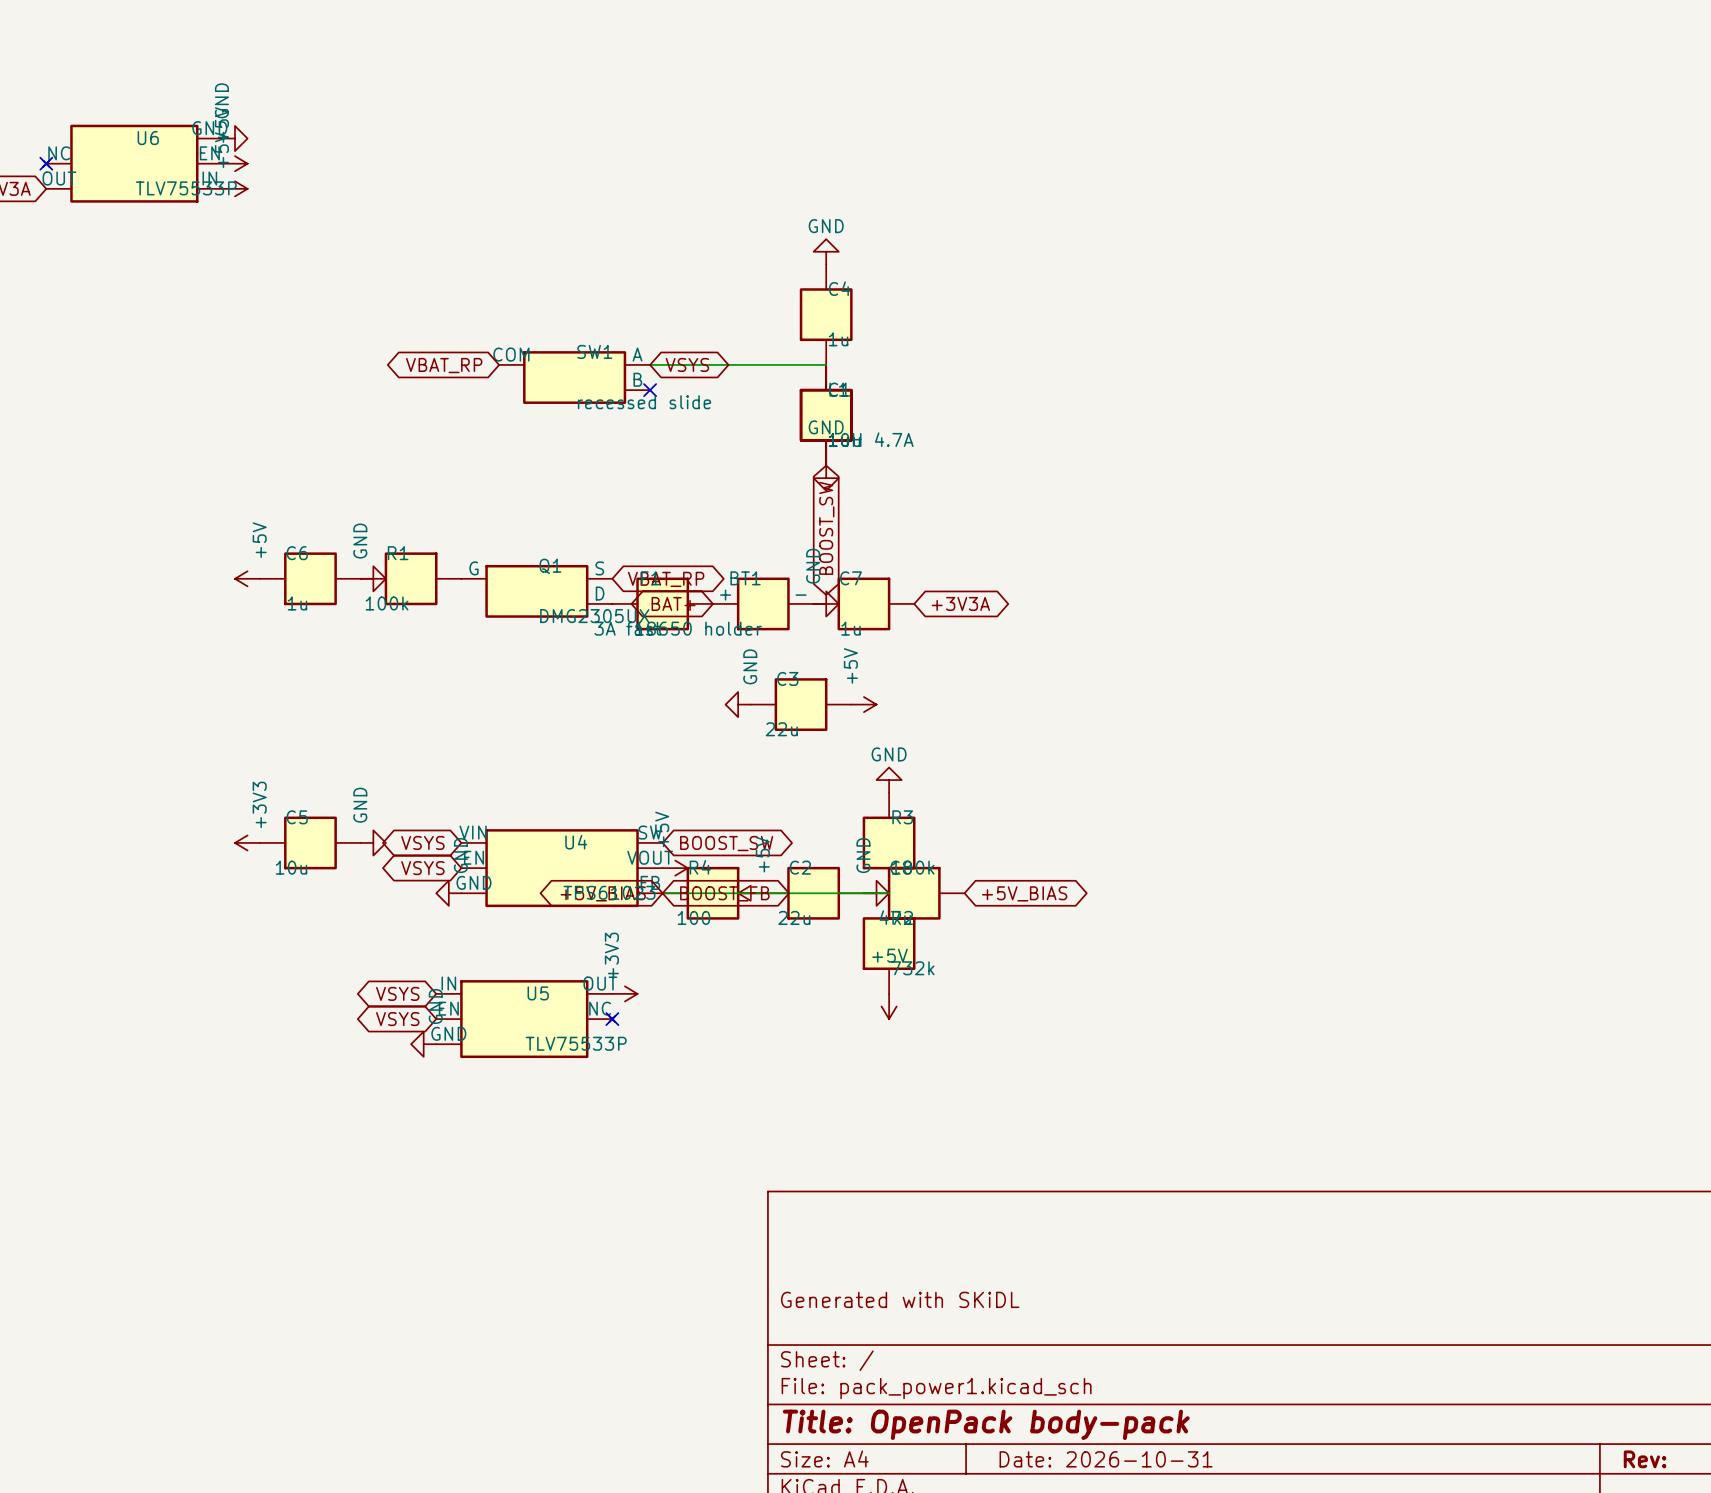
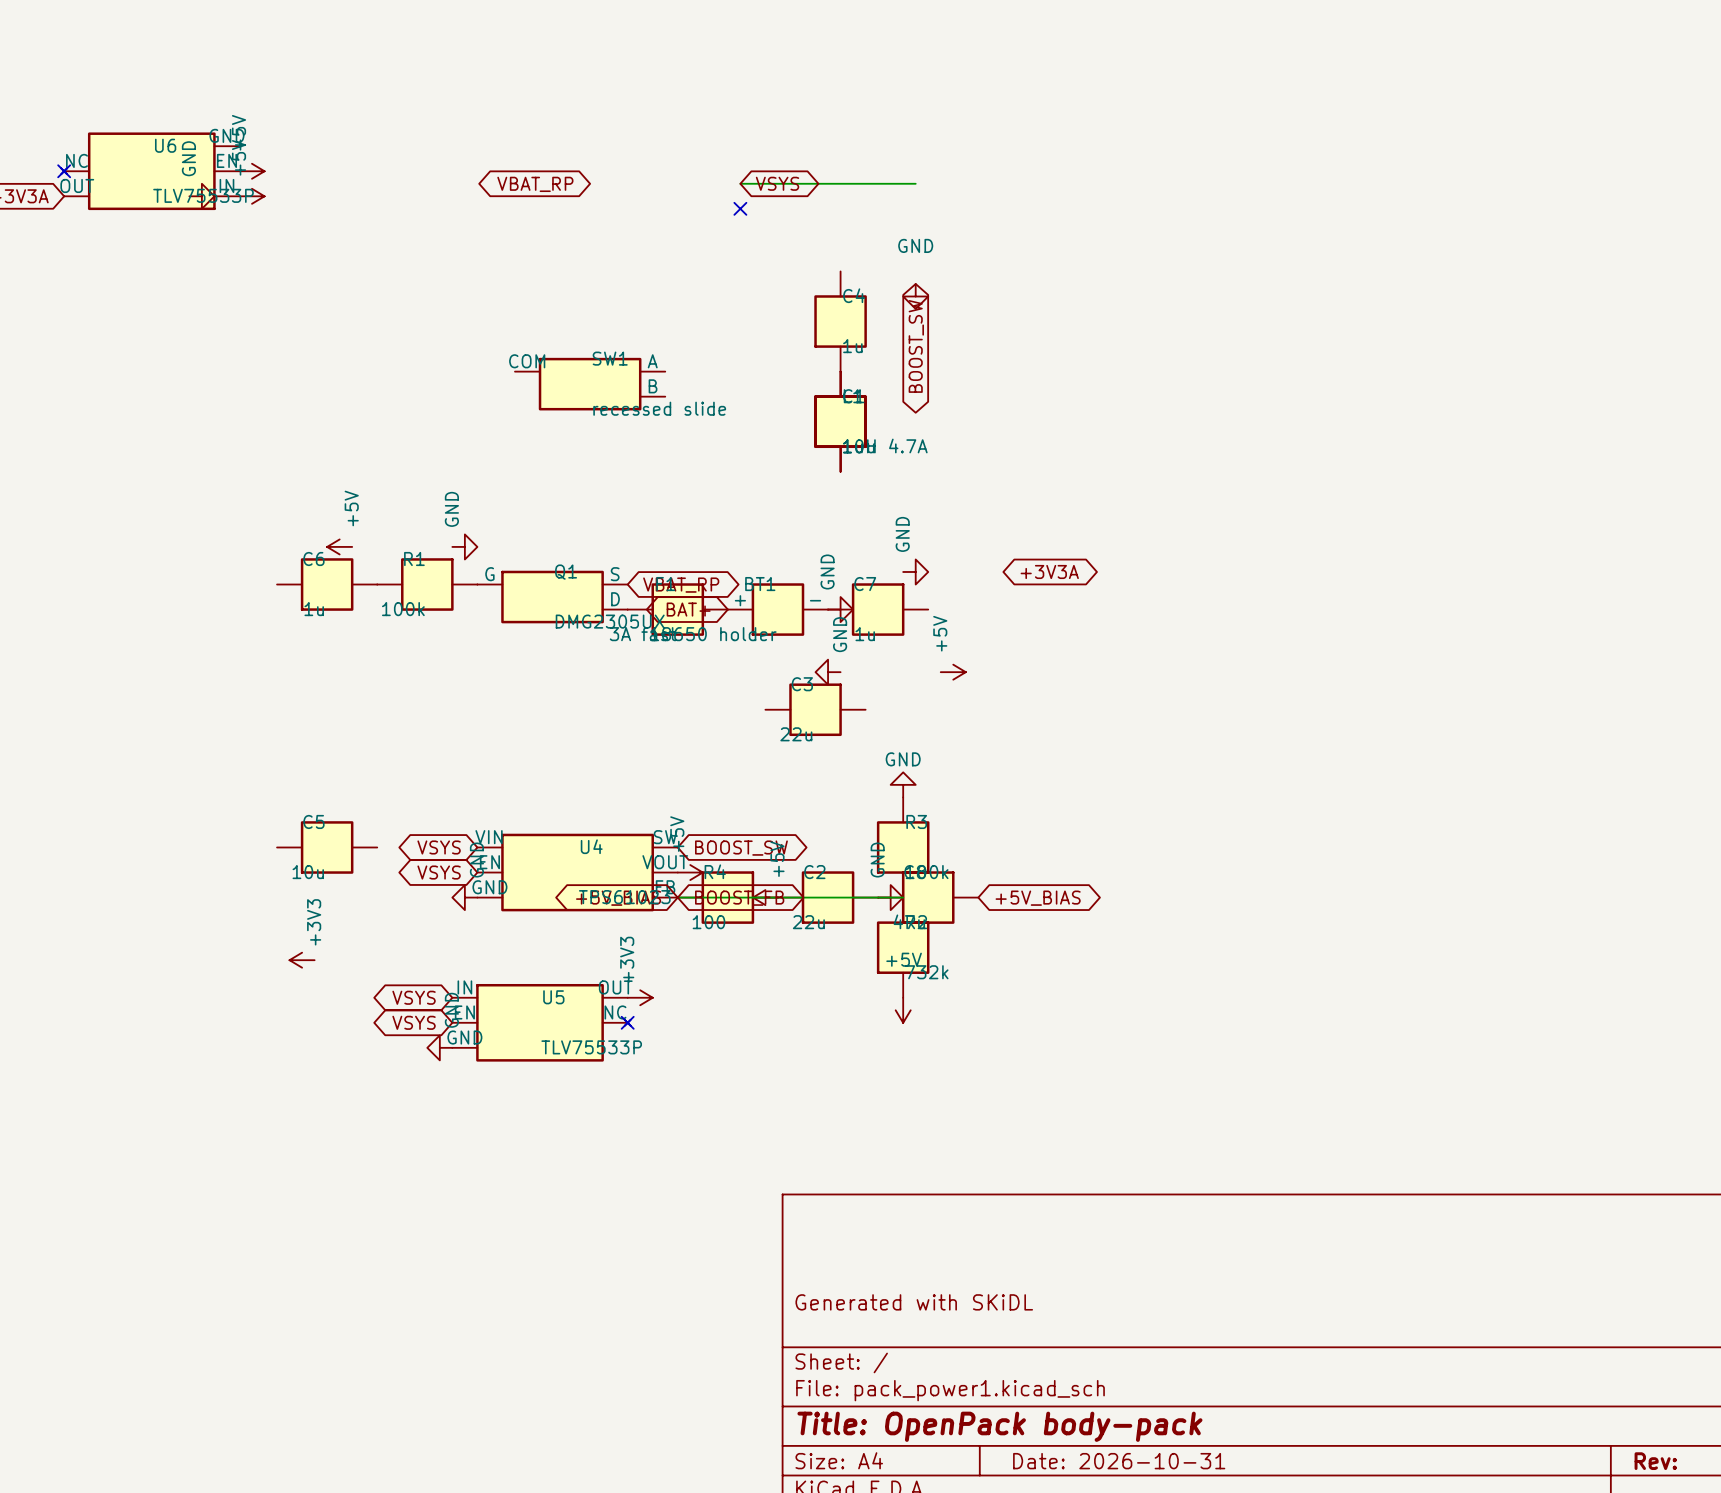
power symbol position: GND (234, 138) -> GND (201, 196)
no-connect mark: none -> (740, 208)
power symbol text position: GND (826, 226) -> GND (915, 245)
power symbol rotation: 0° (826, 251) -> 180° (915, 296)
power symbol position: GND (826, 251) -> GND (915, 296)
wire: (650, 364) (826, 364) -> (740, 183) (915, 183)
global label position: VSYS (687, 364) -> VSYS (777, 183)
global label position: VBAT_RP (444, 365) -> VBAT_RP (535, 184)
no-connect mark: (650, 390) -> none
power symbol: GND (826, 478) -> none
global label position: BOOST_SW (826, 528) -> BOOST_SW (916, 346)
power symbol: none -> GND (915, 571)
power symbol position: +5V (247, 578) -> +5V (339, 546)
power symbol position: GND (373, 578) -> GND (464, 546)
global label position: +3V3A (960, 603) -> +3V3A (1049, 571)
power symbol position: GND (738, 704) -> GND (828, 672)
power symbol position: +5V (863, 704) -> +5V (953, 672)
power symbol position: +3V3 (247, 842) -> +3V3 (302, 960)
power symbol: GND (373, 842) -> none

